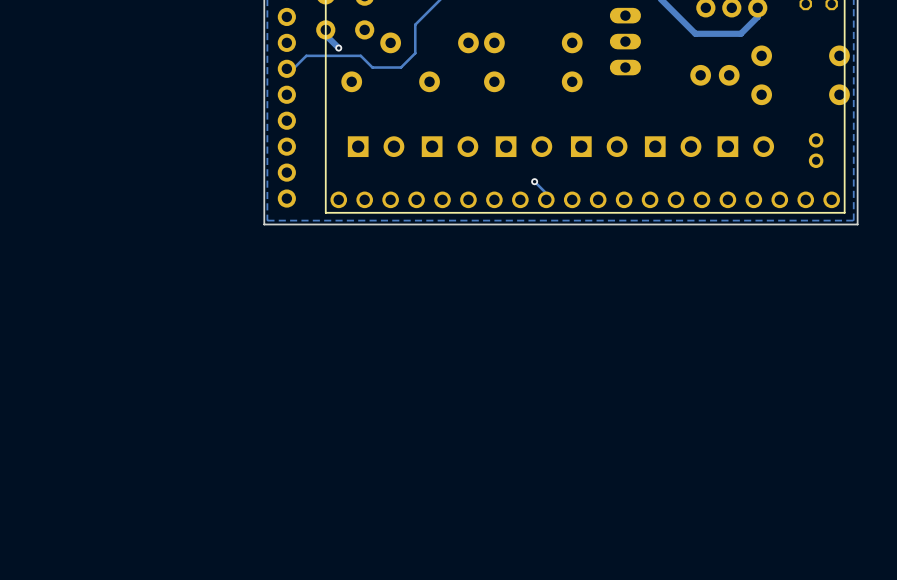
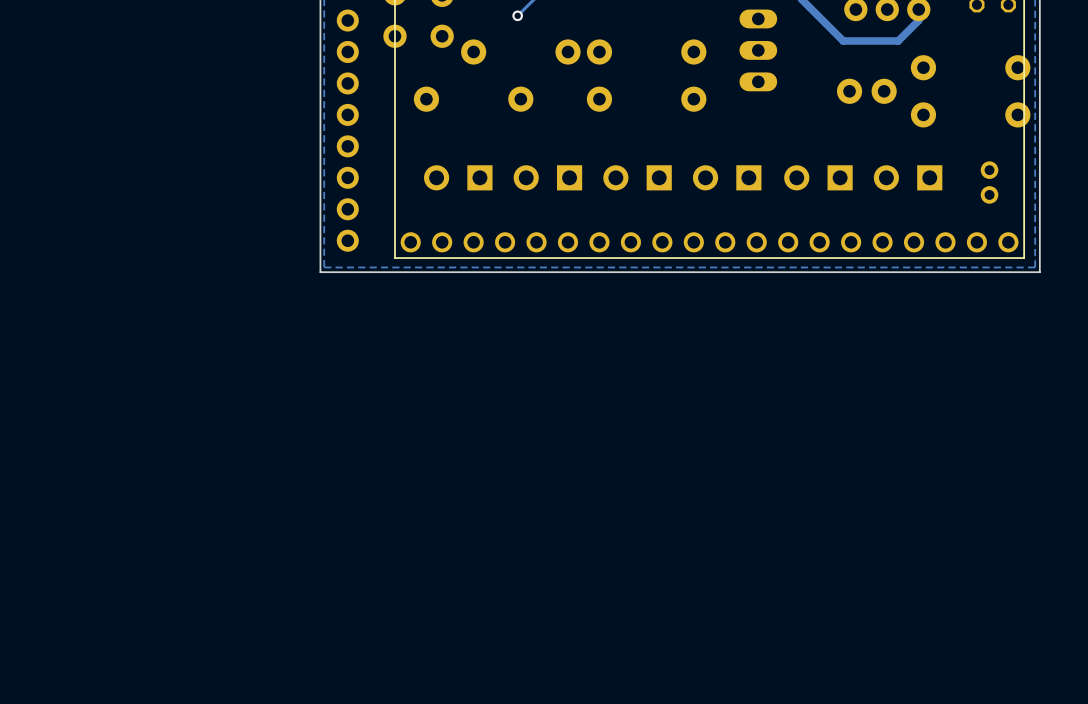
track: (426, 13) (415, 24) (415, 53) (401, 67) (372, 67) (360, 55) (306, 55) (293, 68) (286, 68) -> none
via: none -> (517, 15)
track: (325, 29) (325, 35) (338, 48) -> none
via: (338, 48) -> none
part rotation: 0° (376, 146) -> 180° (458, 177)
part rotation: 0° (450, 146) -> 180° (547, 177)
part rotation: 0° (523, 146) -> 180° (637, 177)
part rotation: 0° (599, 146) -> 180° (727, 177)
part rotation: 0° (673, 146) -> 180° (818, 177)
part rotation: 0° (745, 146) -> 180° (908, 177)
track: (534, 181) (546, 193) (546, 199) -> none
via: (534, 181) -> none

